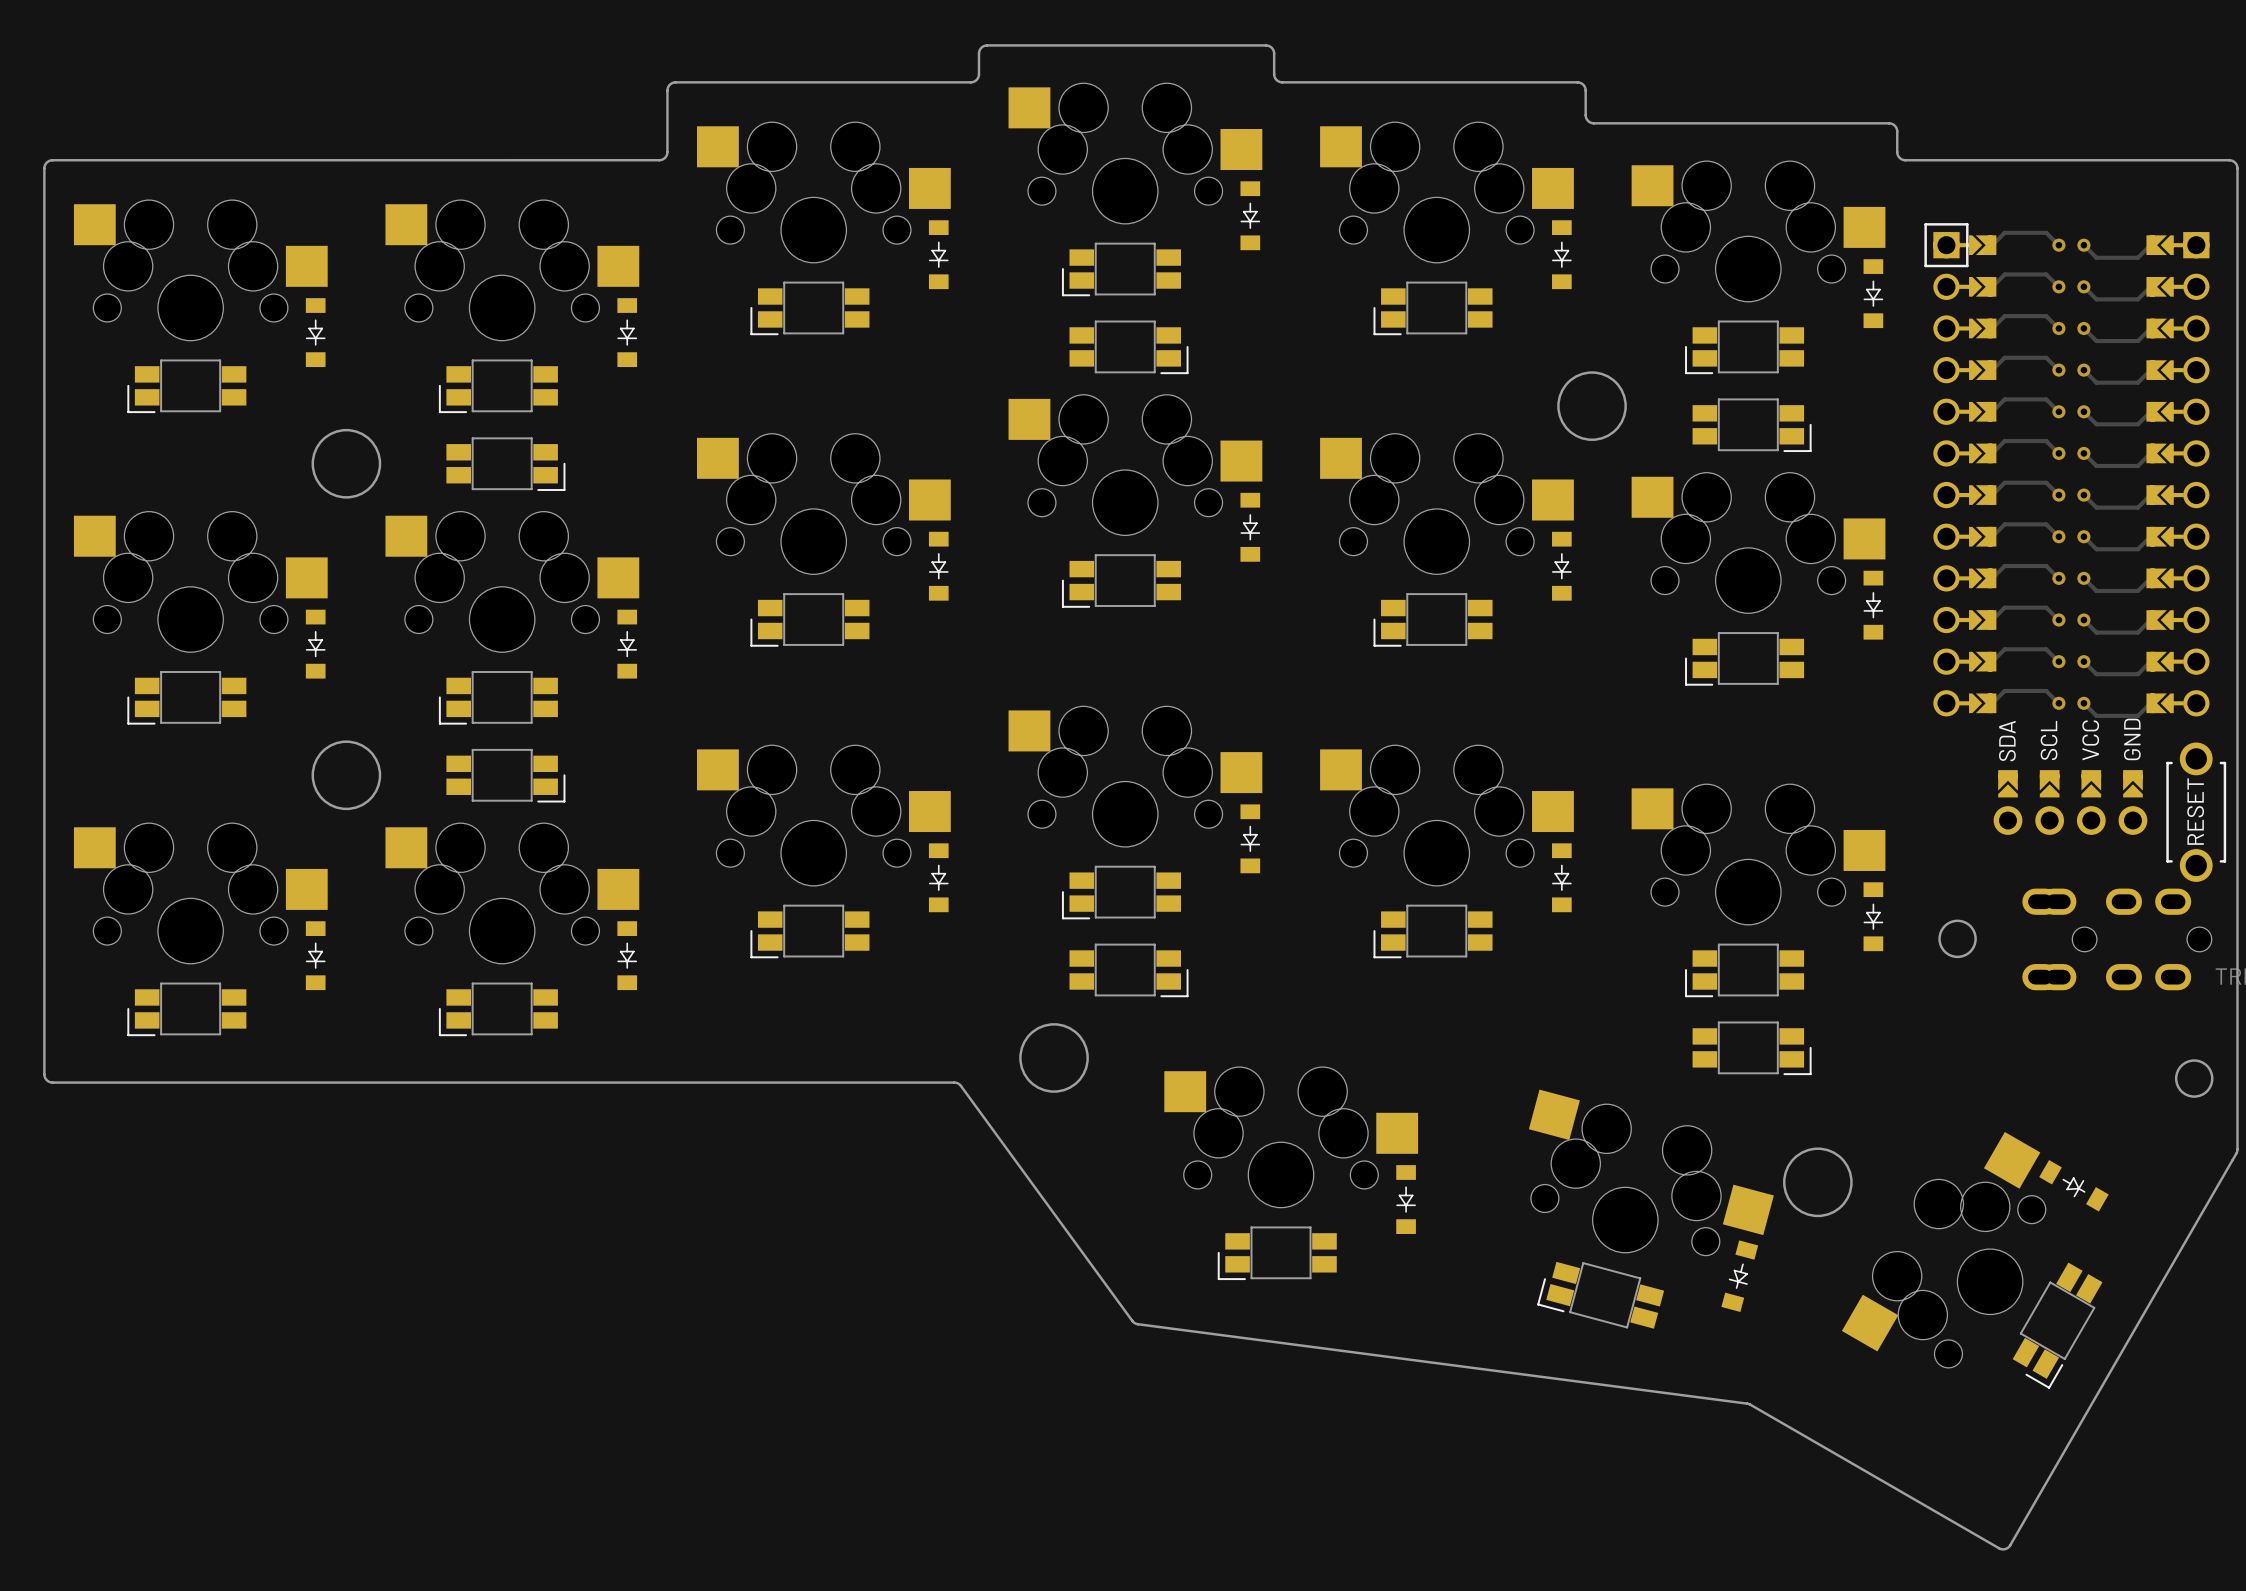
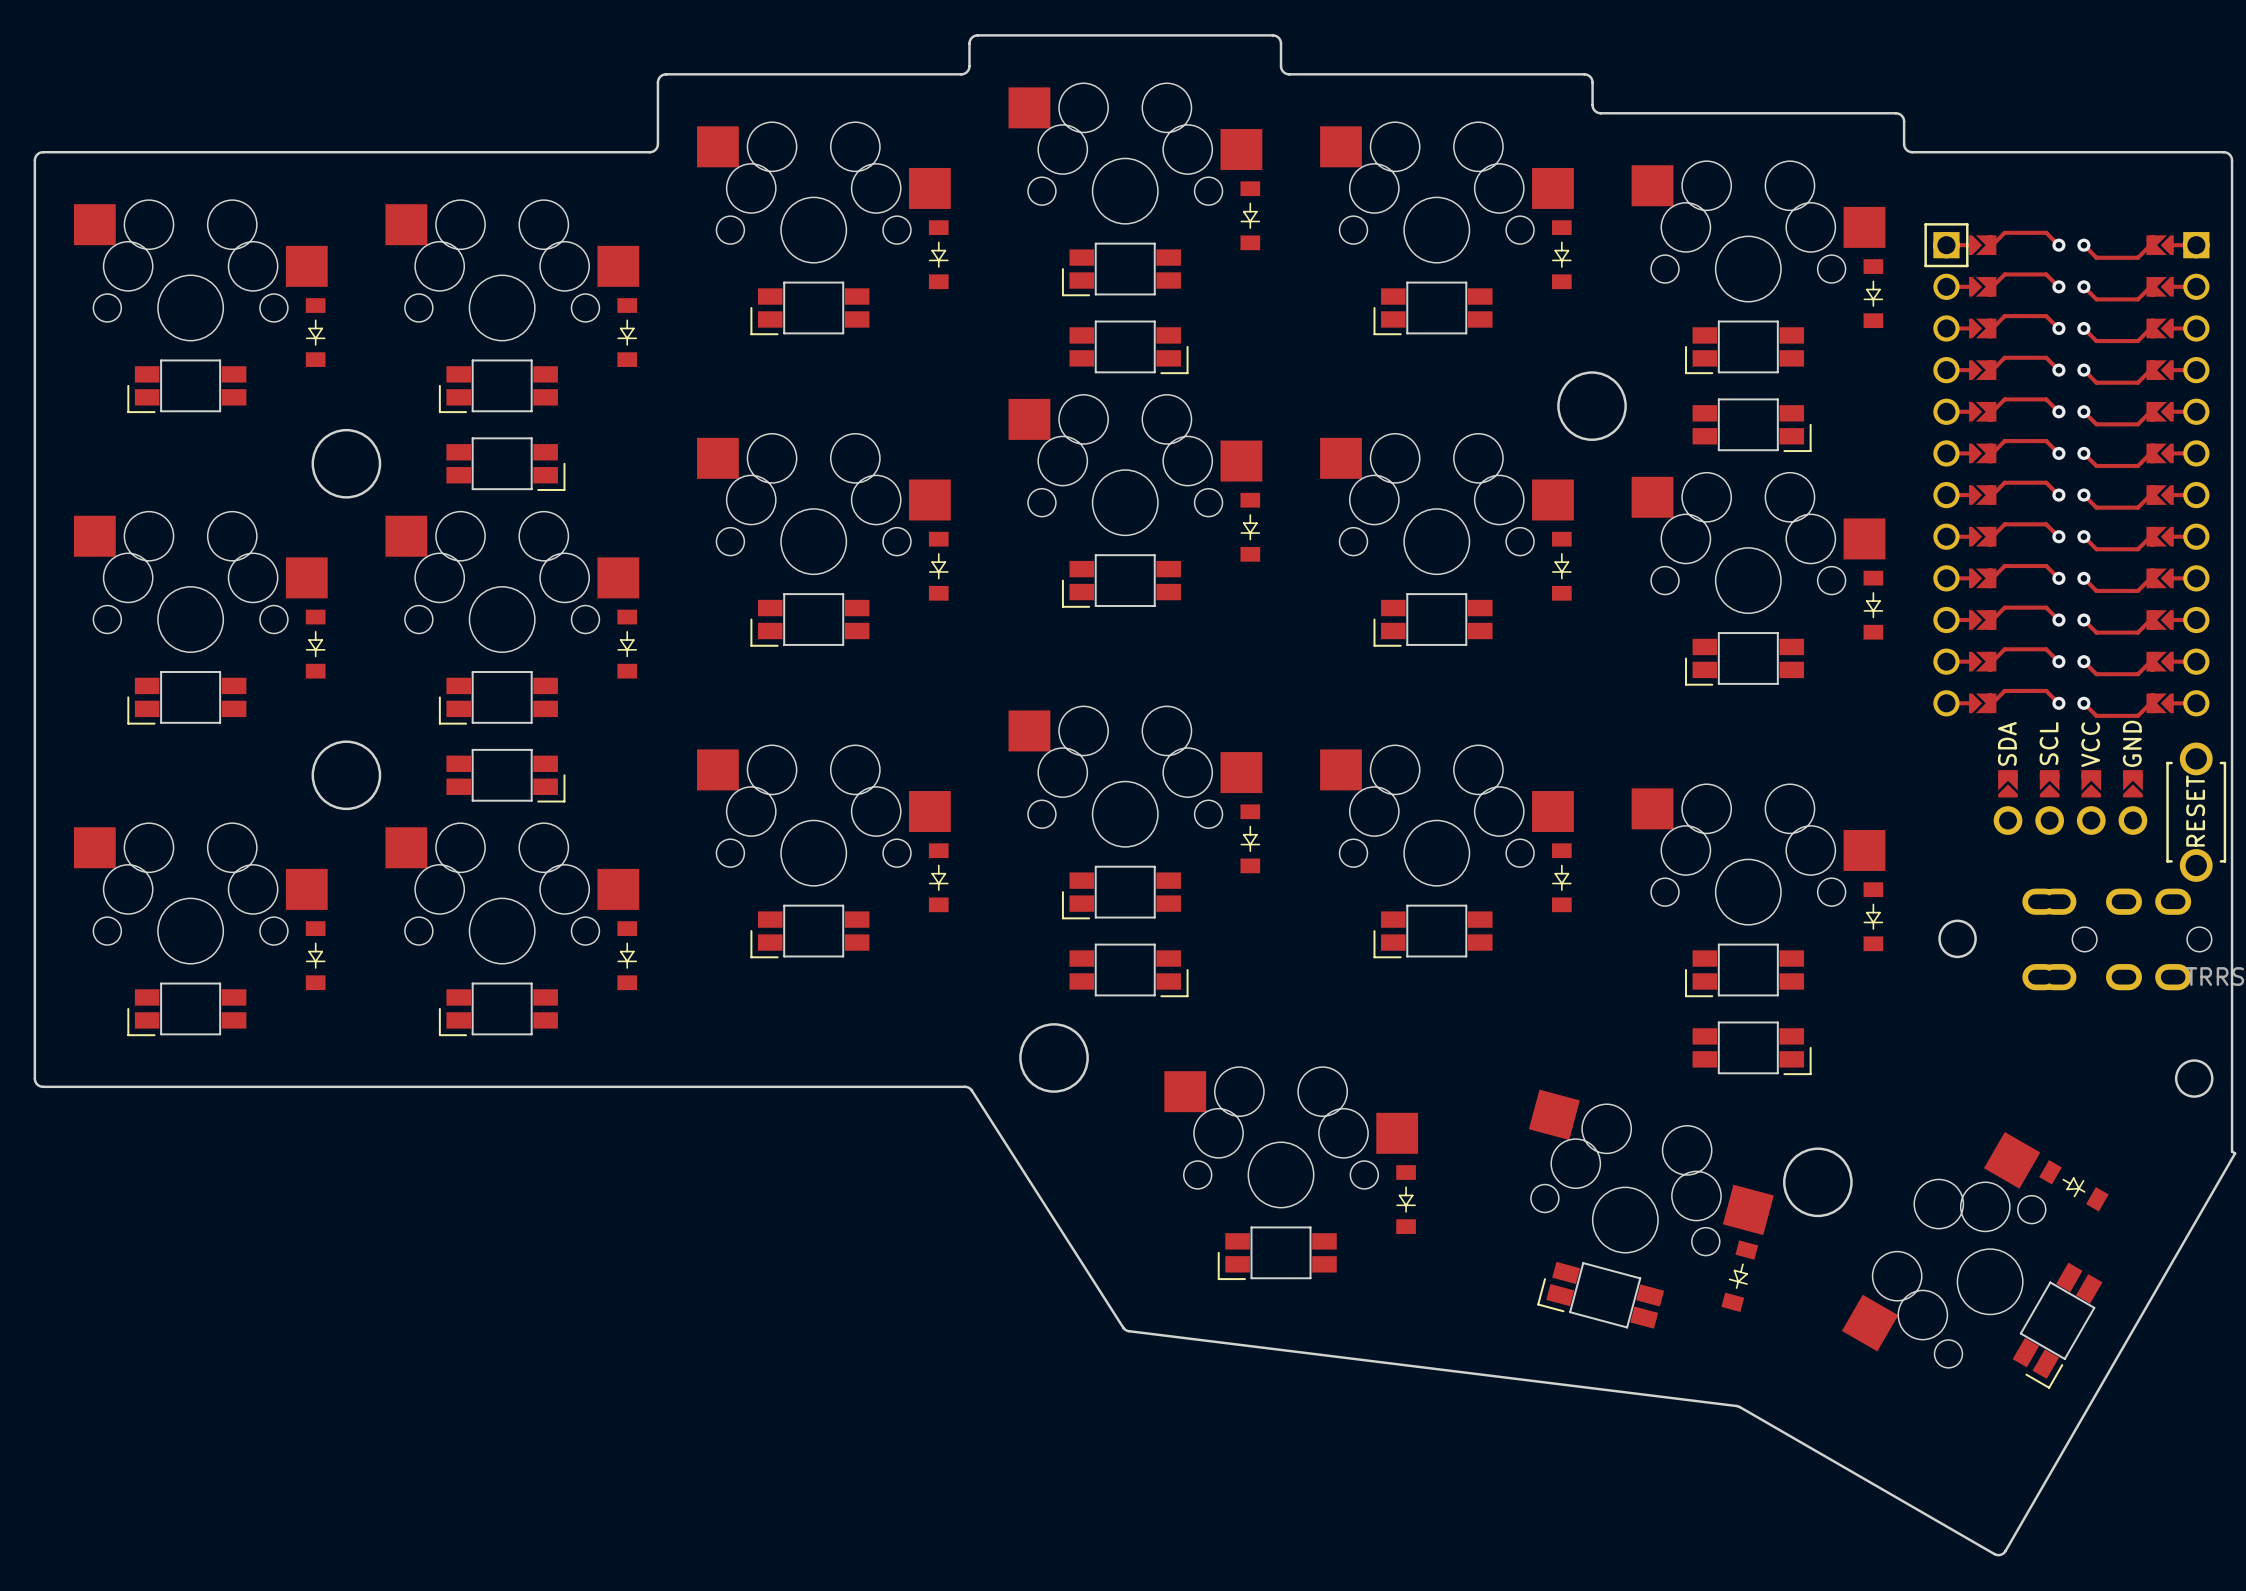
board edge: (987, 45) (1267, 45) (1273, 51) (1274, 77) (1282, 82) (1578, 82) (1585, 88) (1585, 116) (1591, 123) (1890, 123) (1896, 128) (1897, 154) (1904, 160) (2229, 160) (2235, 163) (2237, 168) (2237, 1150) (2007, 1547) (1999, 1548) (1748, 1403) (1135, 1323) (960, 1085) (956, 1082) (52, 1082) (46, 1079) (44, 1074) (44, 168) (46, 162) (52, 160) (660, 160) (665, 157) (667, 153) (667, 89) (672, 82) (971, 82) (978, 76) (979, 50) (987, 45) -> (977, 35) (970, 40) (969, 68) (962, 74) (663, 74) (658, 81) (657, 145) (655, 149) (650, 152) (43, 152) (37, 154) (34, 160) (34, 1078) (36, 1083) (43, 1086) (967, 1087) (971, 1090) (1126, 1330) (1737, 1406) (1994, 1554) (2003, 1553) (2235, 1153) (2232, 1151) (2232, 160) (2230, 155) (2223, 152) (1911, 152) (1904, 147) (1903, 119) (1896, 113) (1599, 113) (1593, 108) (1592, 80) (1585, 74) (1288, 74) (1281, 69) (1280, 41) (1273, 35) (977, 35)

